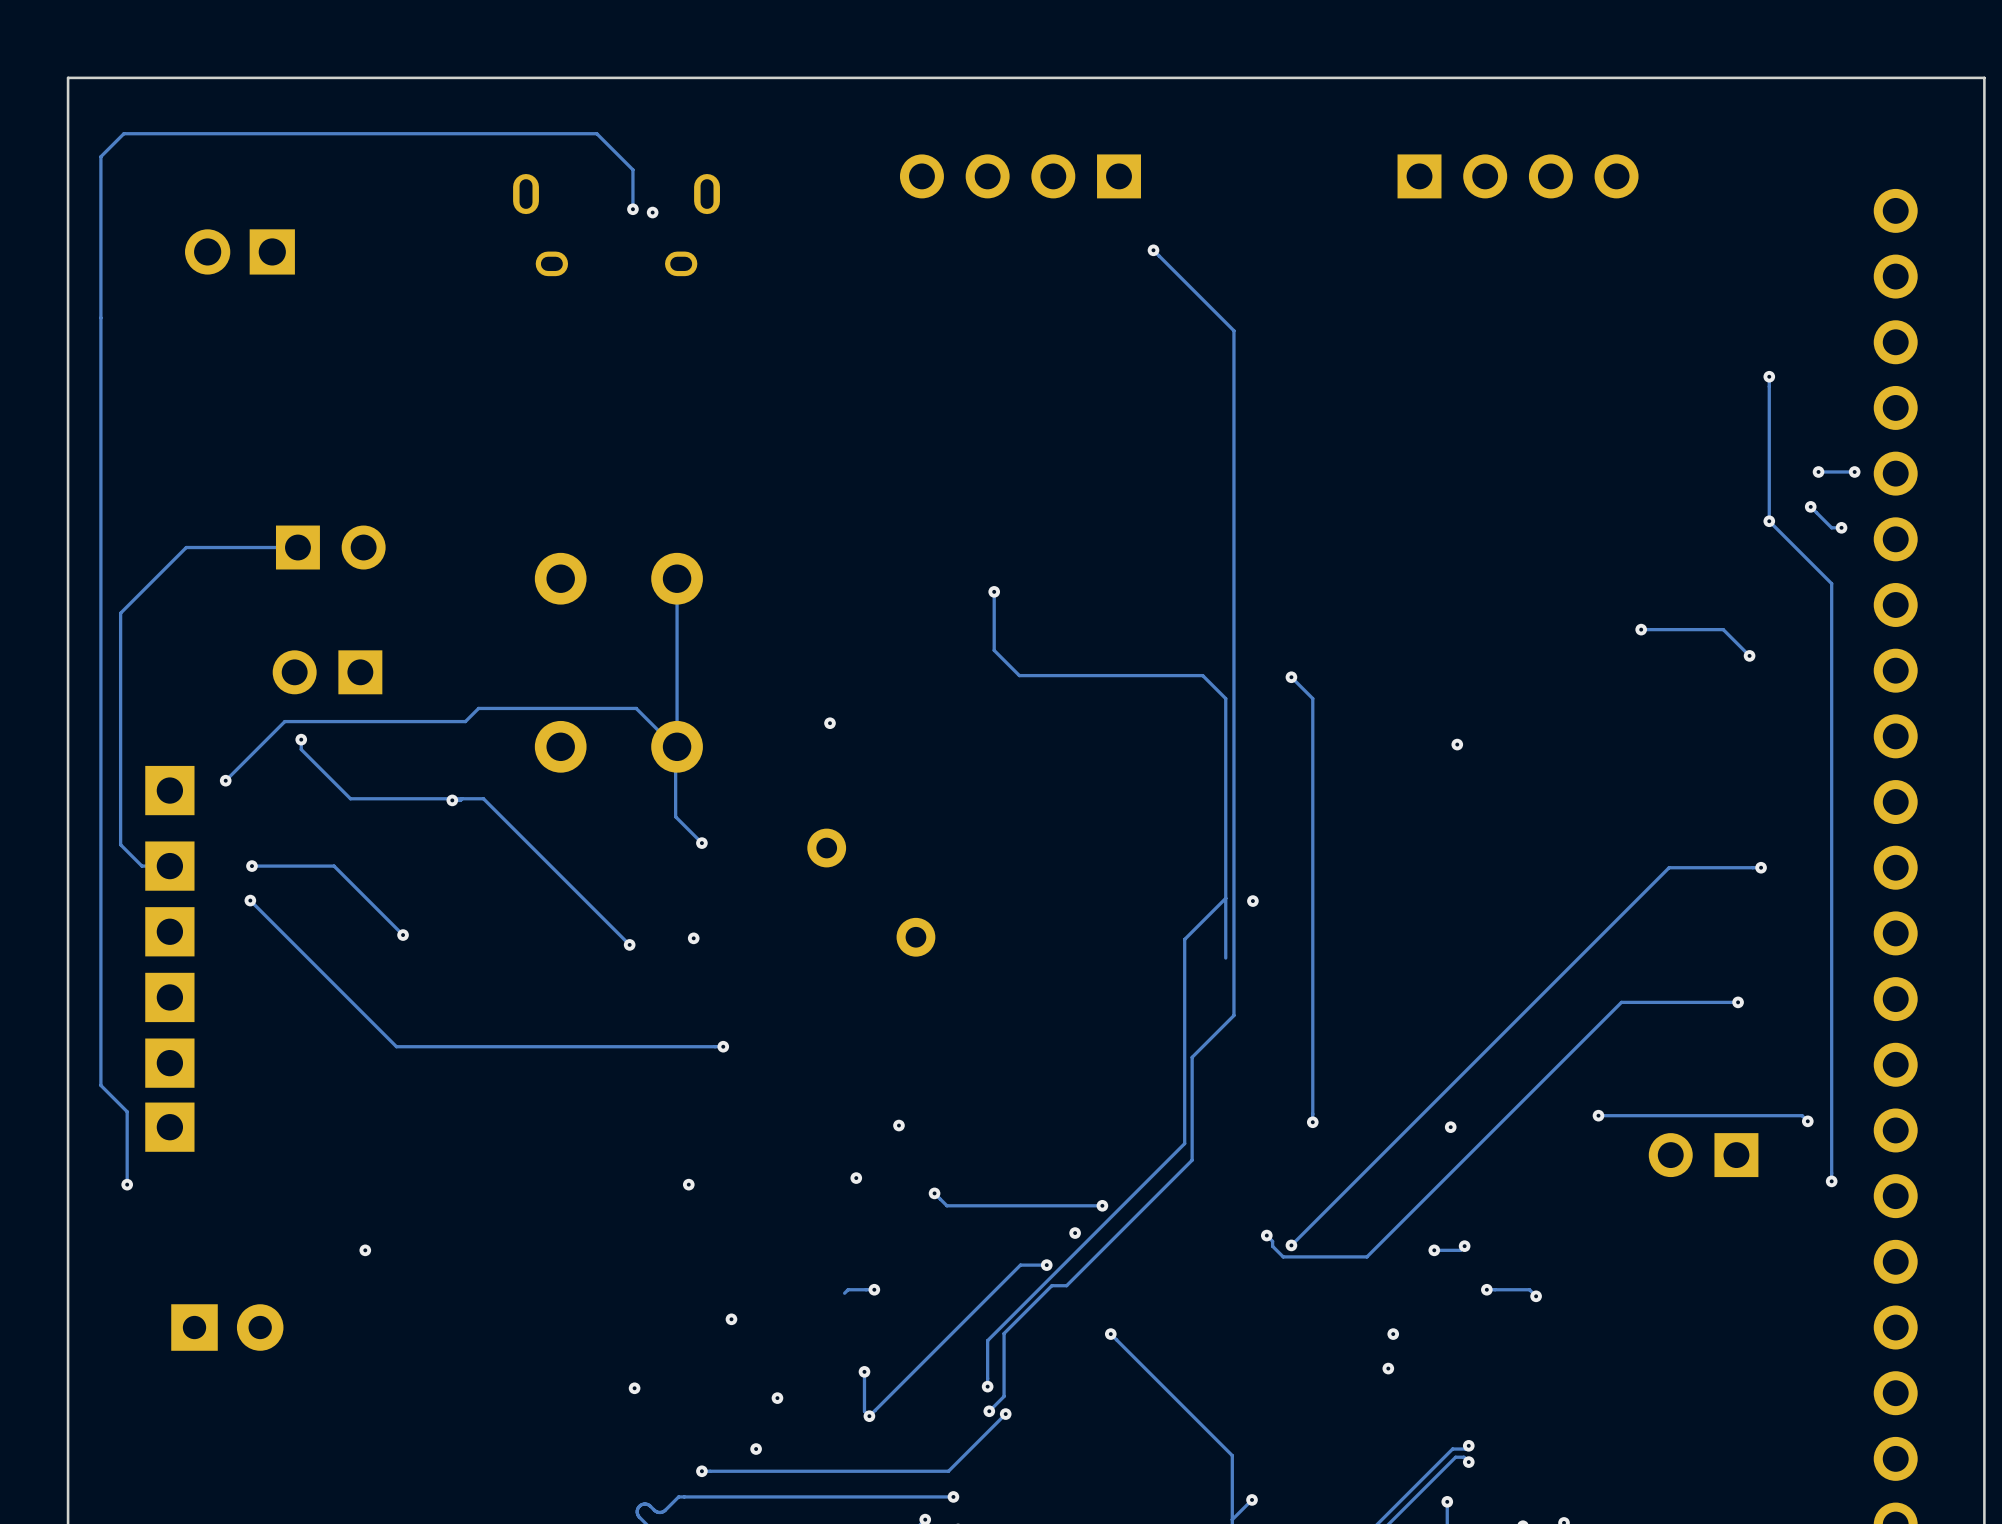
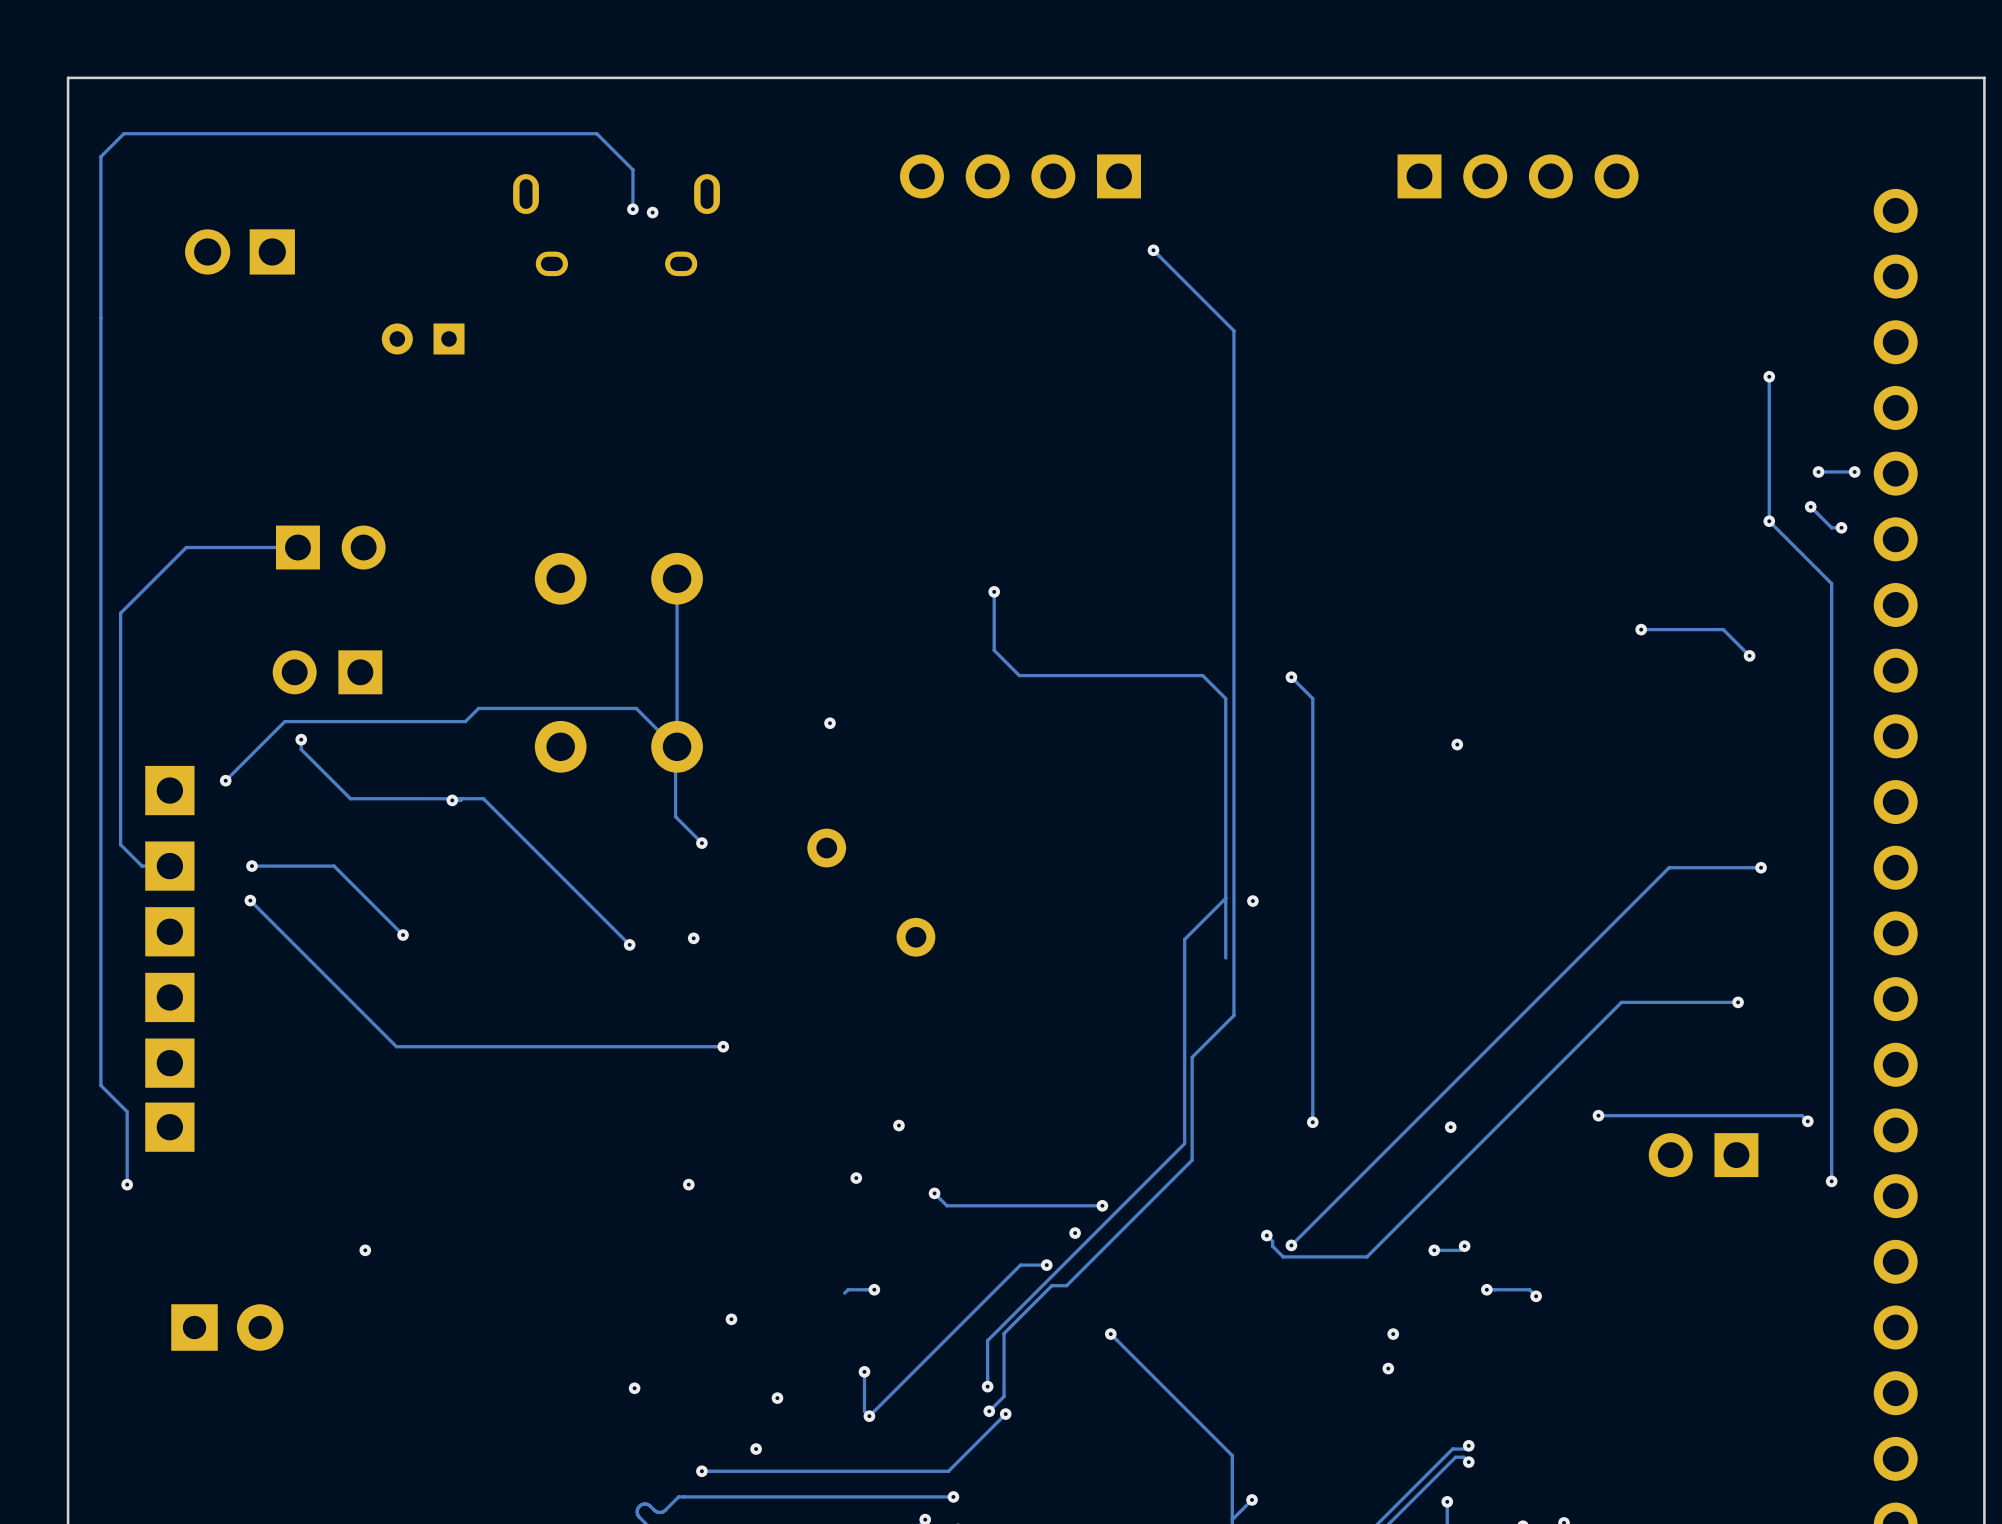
part: none -> (423, 338)

